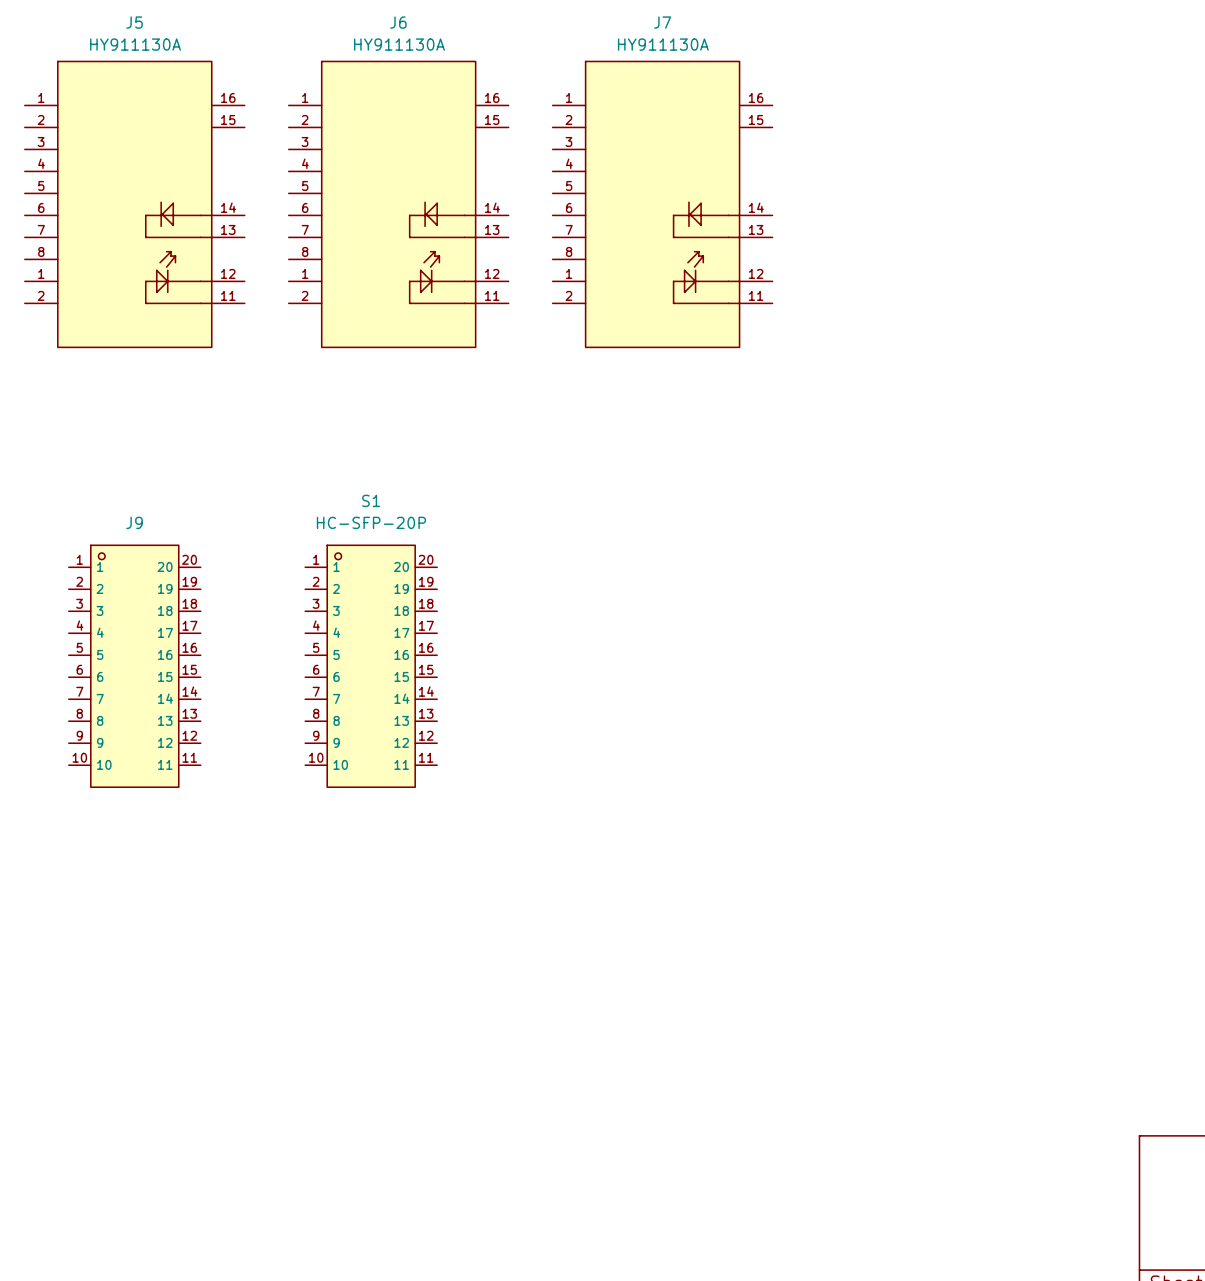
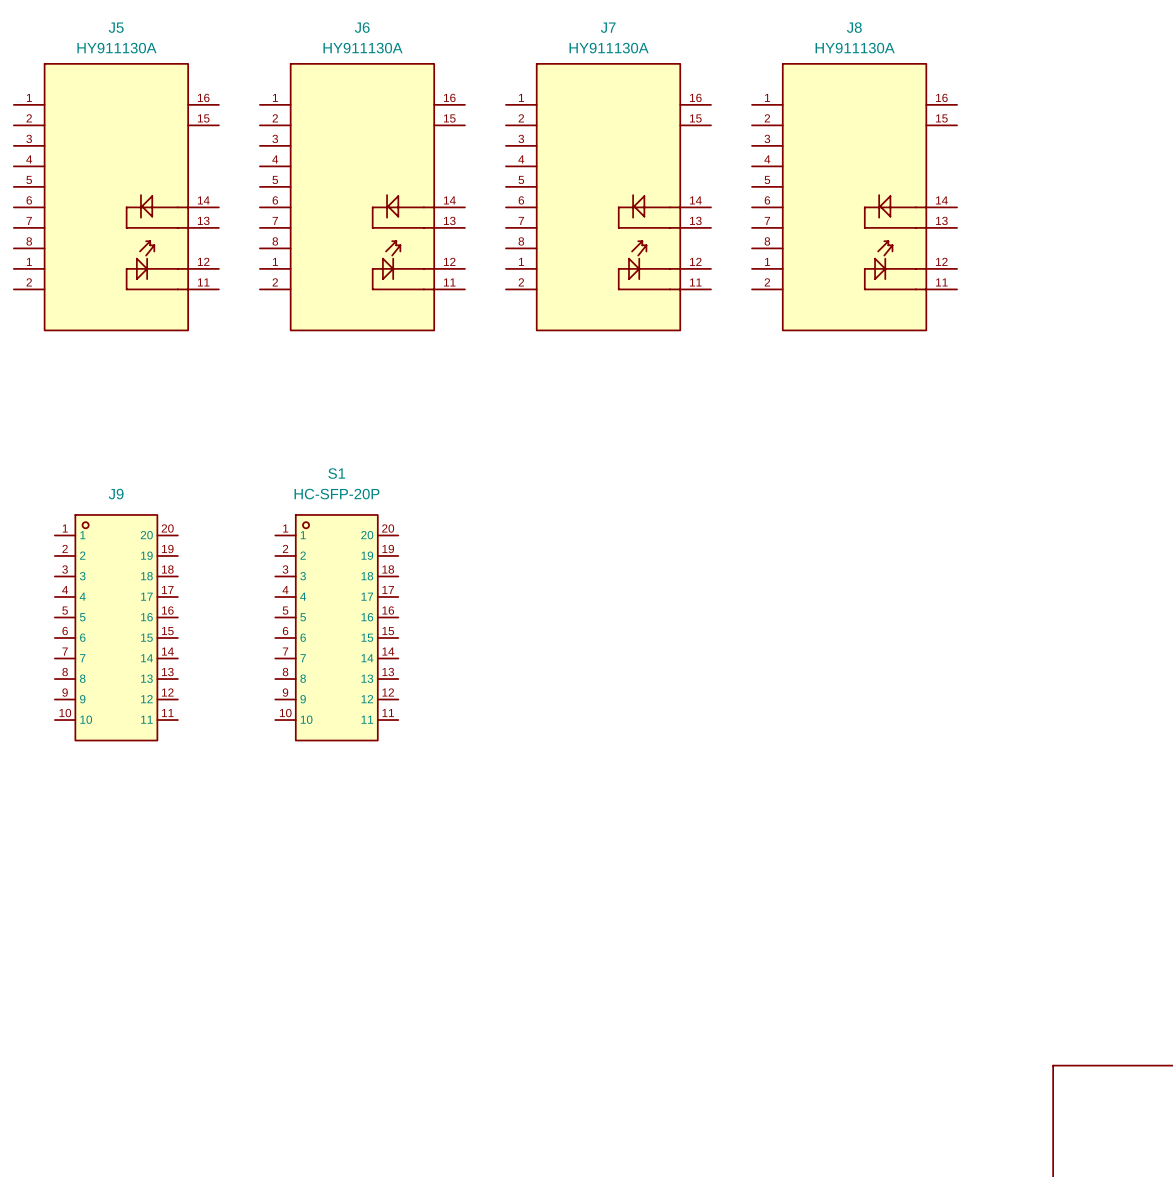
J8: none -> HY911130A (854, 197)

